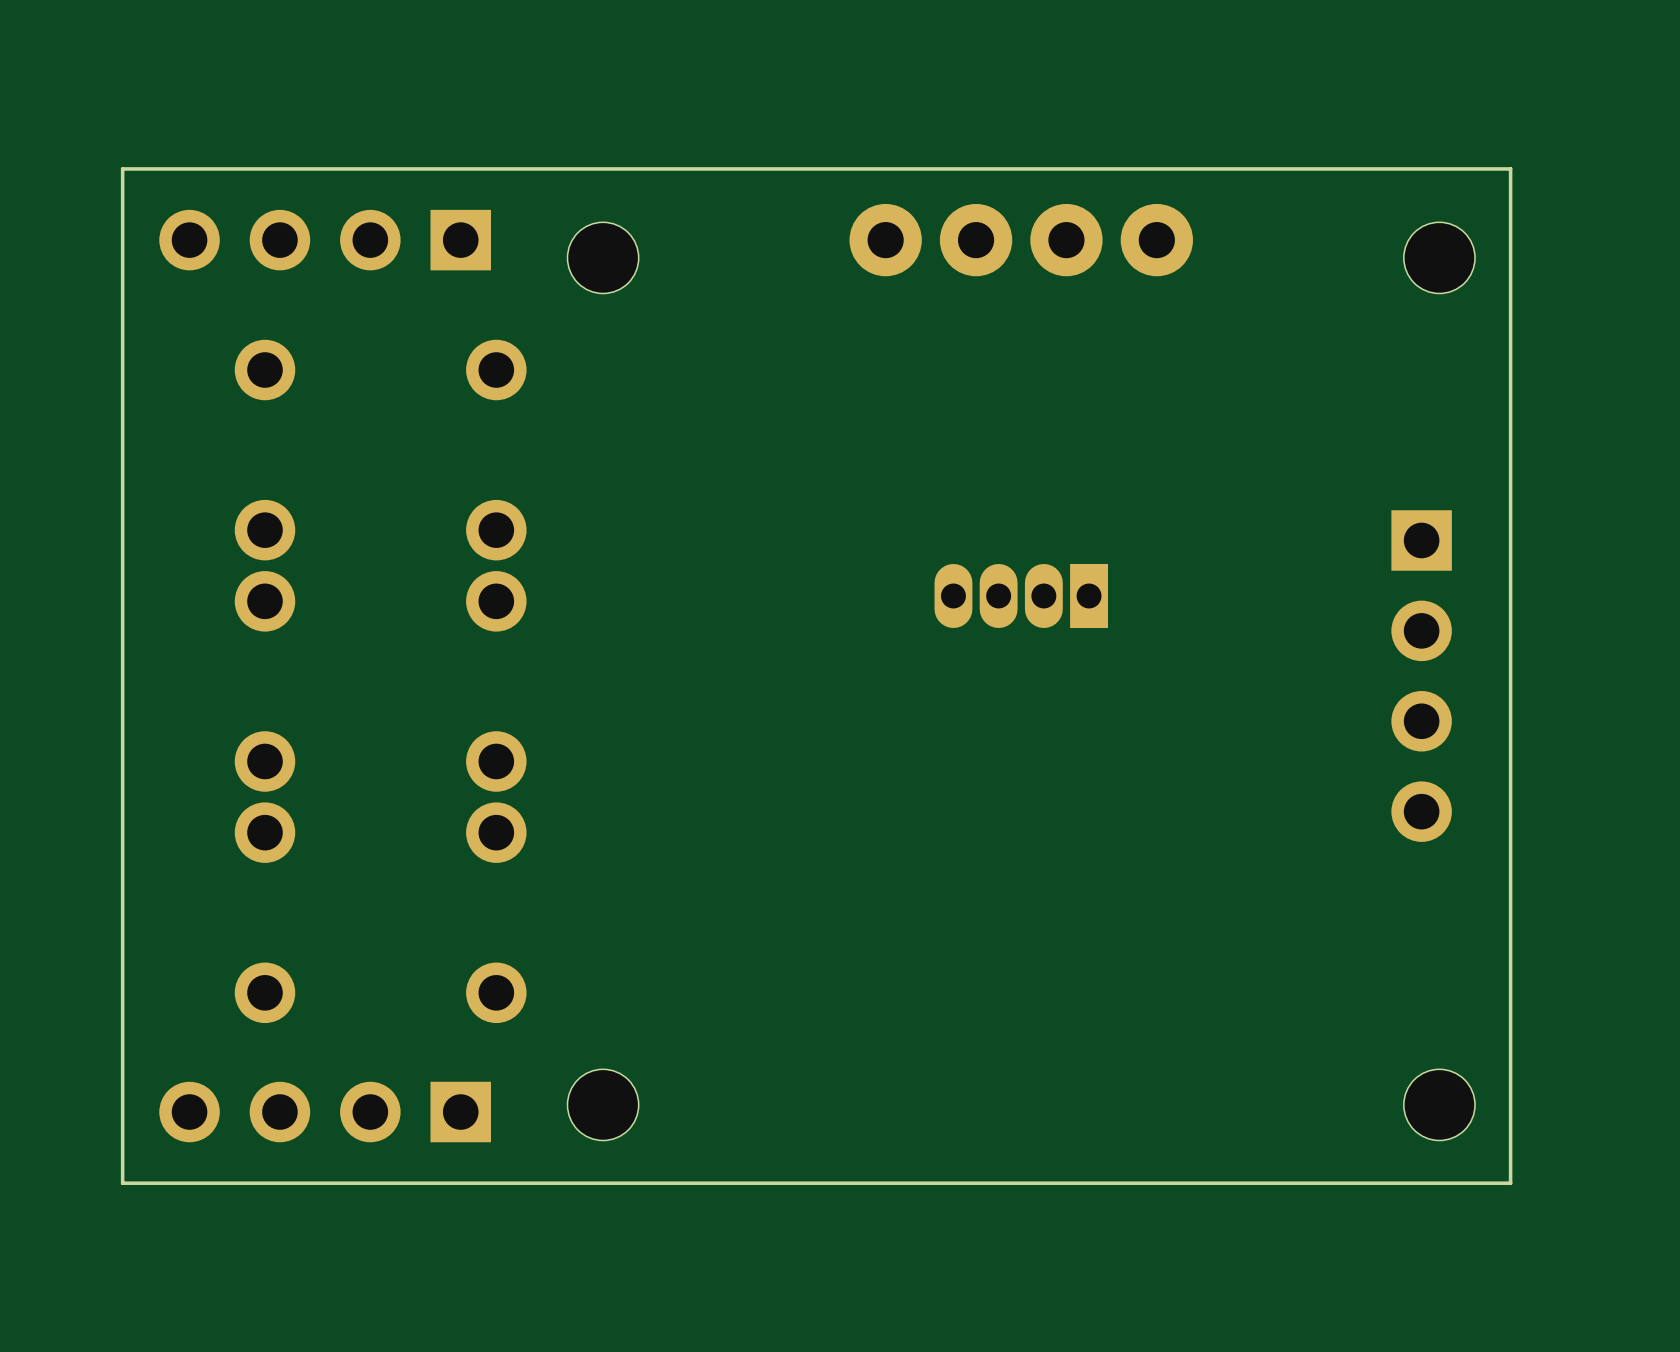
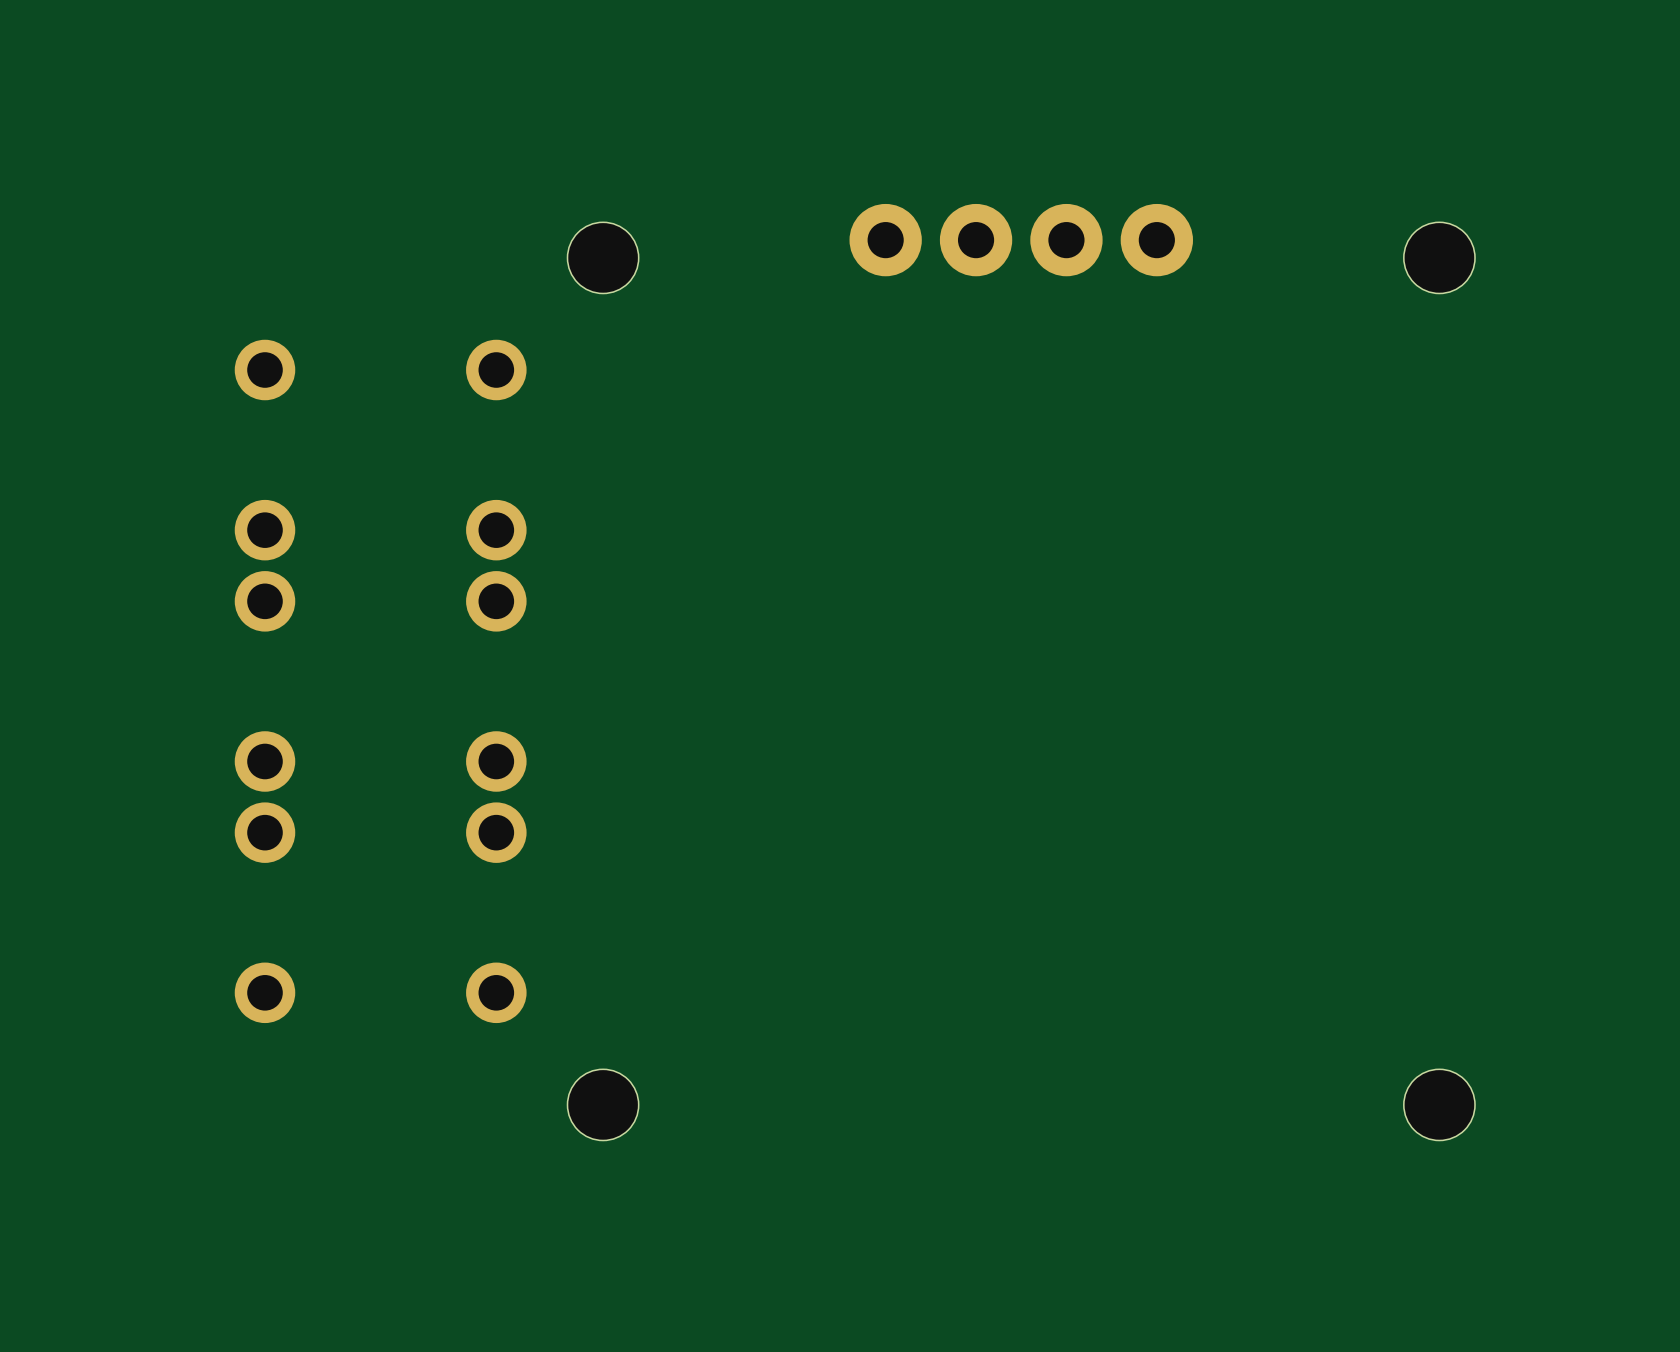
board edge: (1510, 168) (1510, 1183) (122, 1183) (122, 168) (1510, 168) -> none
part: (325, 240) -> none
part: (1021, 595) -> none
part: (1421, 676) -> none
part: (325, 1112) -> none

